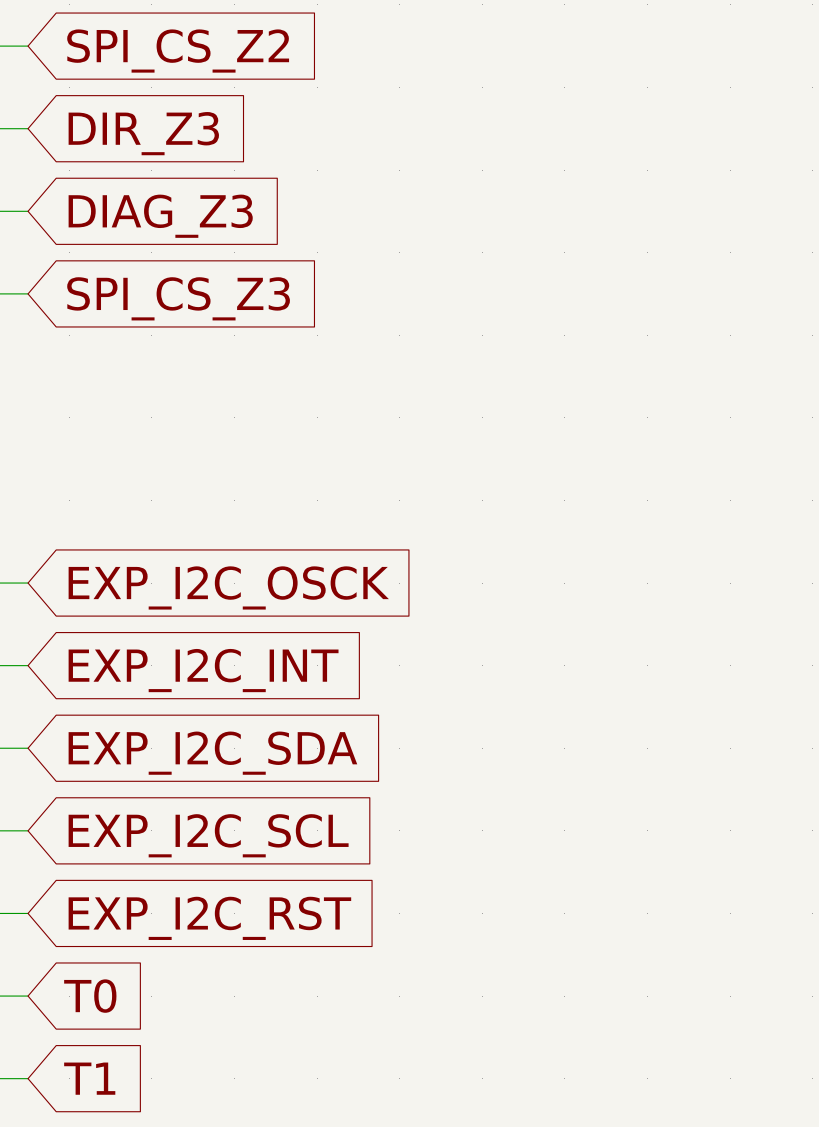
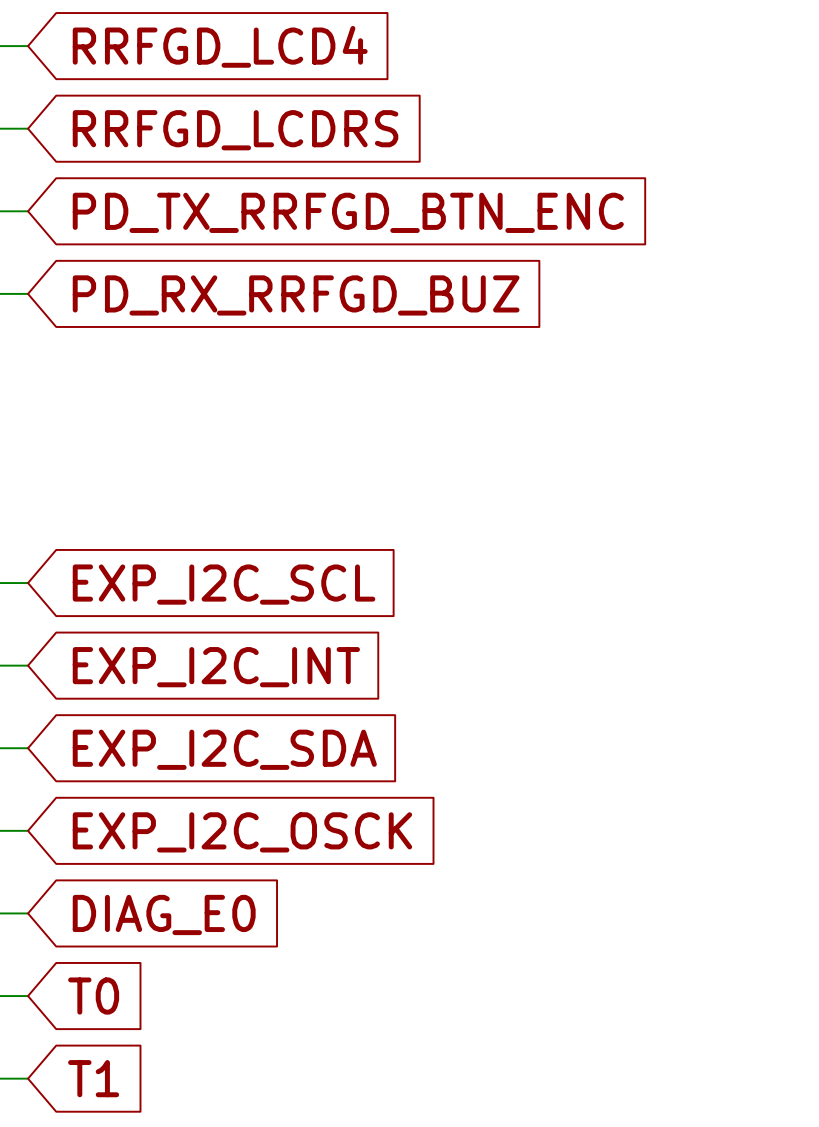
global label: SPI_CS_Z2 (178, 51) -> RRFGD_LCD4 (220, 46)
global label: DIR_Z3 (143, 133) -> RRFGD_LCDRS (235, 130)
global label: DIAG_Z3 (160, 216) -> PD_TX_RRFGD_BTN_ENC (348, 212)
global label: SPI_CS_Z3 (178, 298) -> PD_RX_RRFGD_BUZ (296, 295)
global label: EXP_I2C_OSCK (228, 587) -> EXP_I2C_SCL (224, 584)
global label: EXP_I2C_SCL (208, 835) -> EXP_I2C_OSCK (242, 832)
global label: EXP_I2C_RST (209, 918) -> DIAG_E0 (164, 914)

